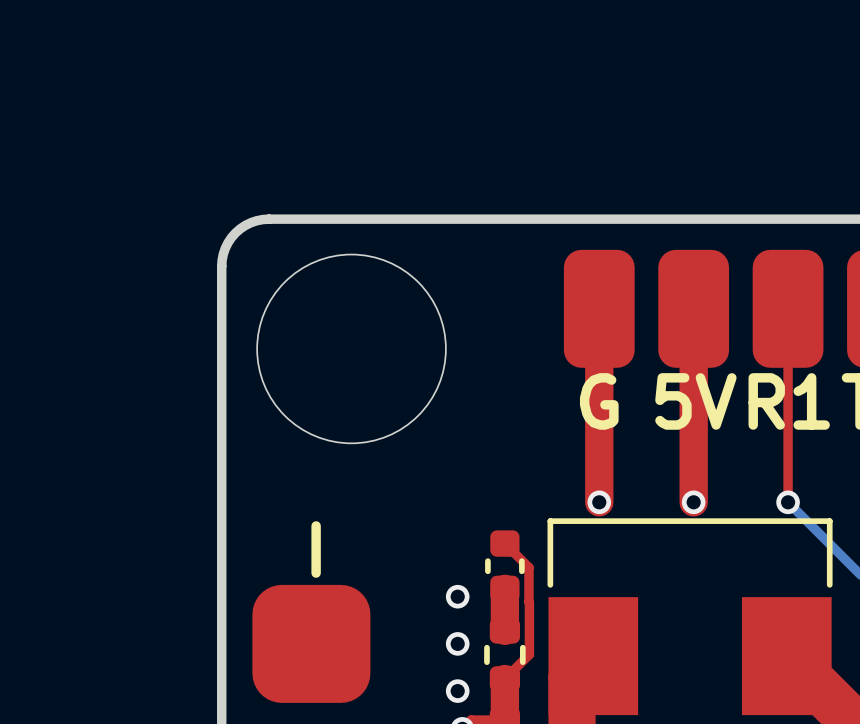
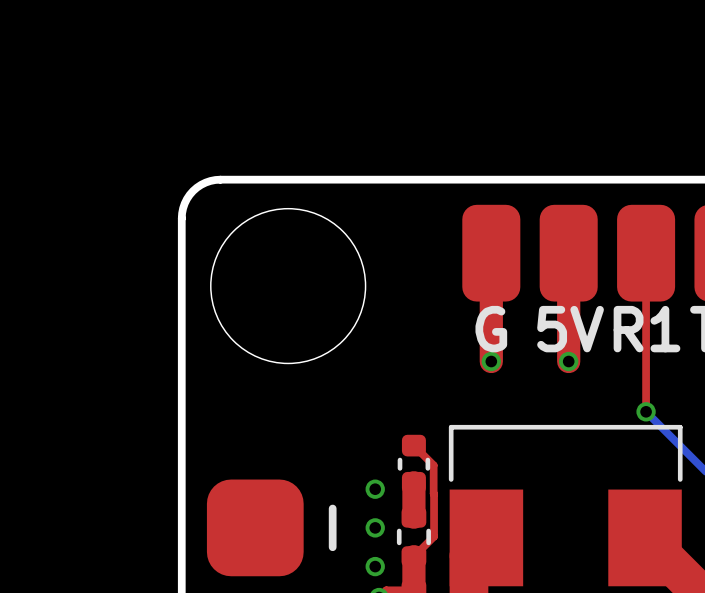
top track: (599, 440) (599, 502) -> none
via: none -> (491, 361)
top track: (693, 440) (693, 502) -> none
via: none -> (568, 361)
via: (599, 502) -> none
via: (693, 502) -> none
line: (316, 525) (316, 573) -> (332, 508) (332, 547)

